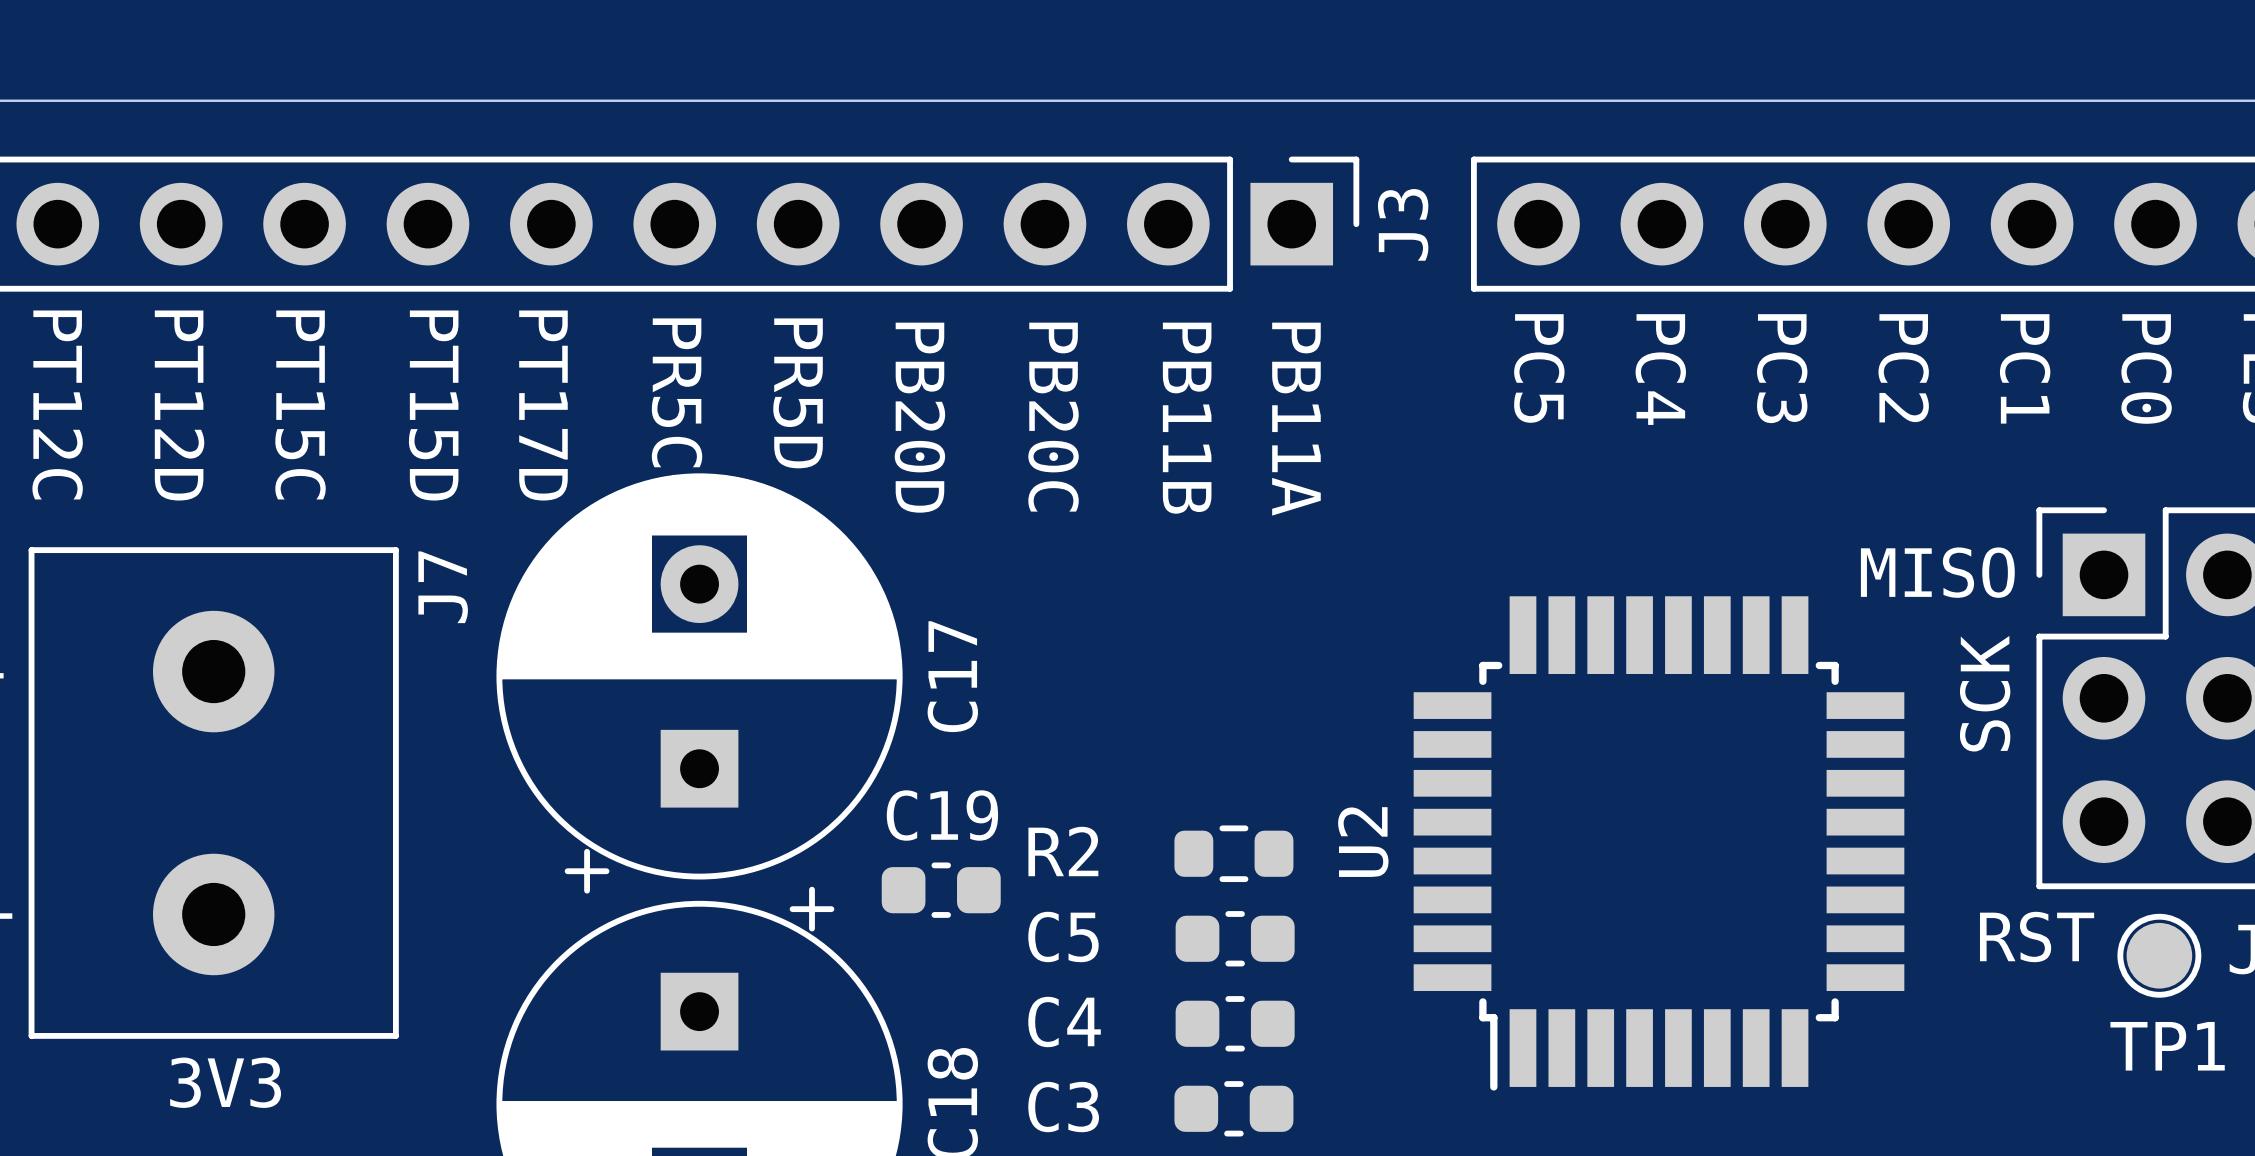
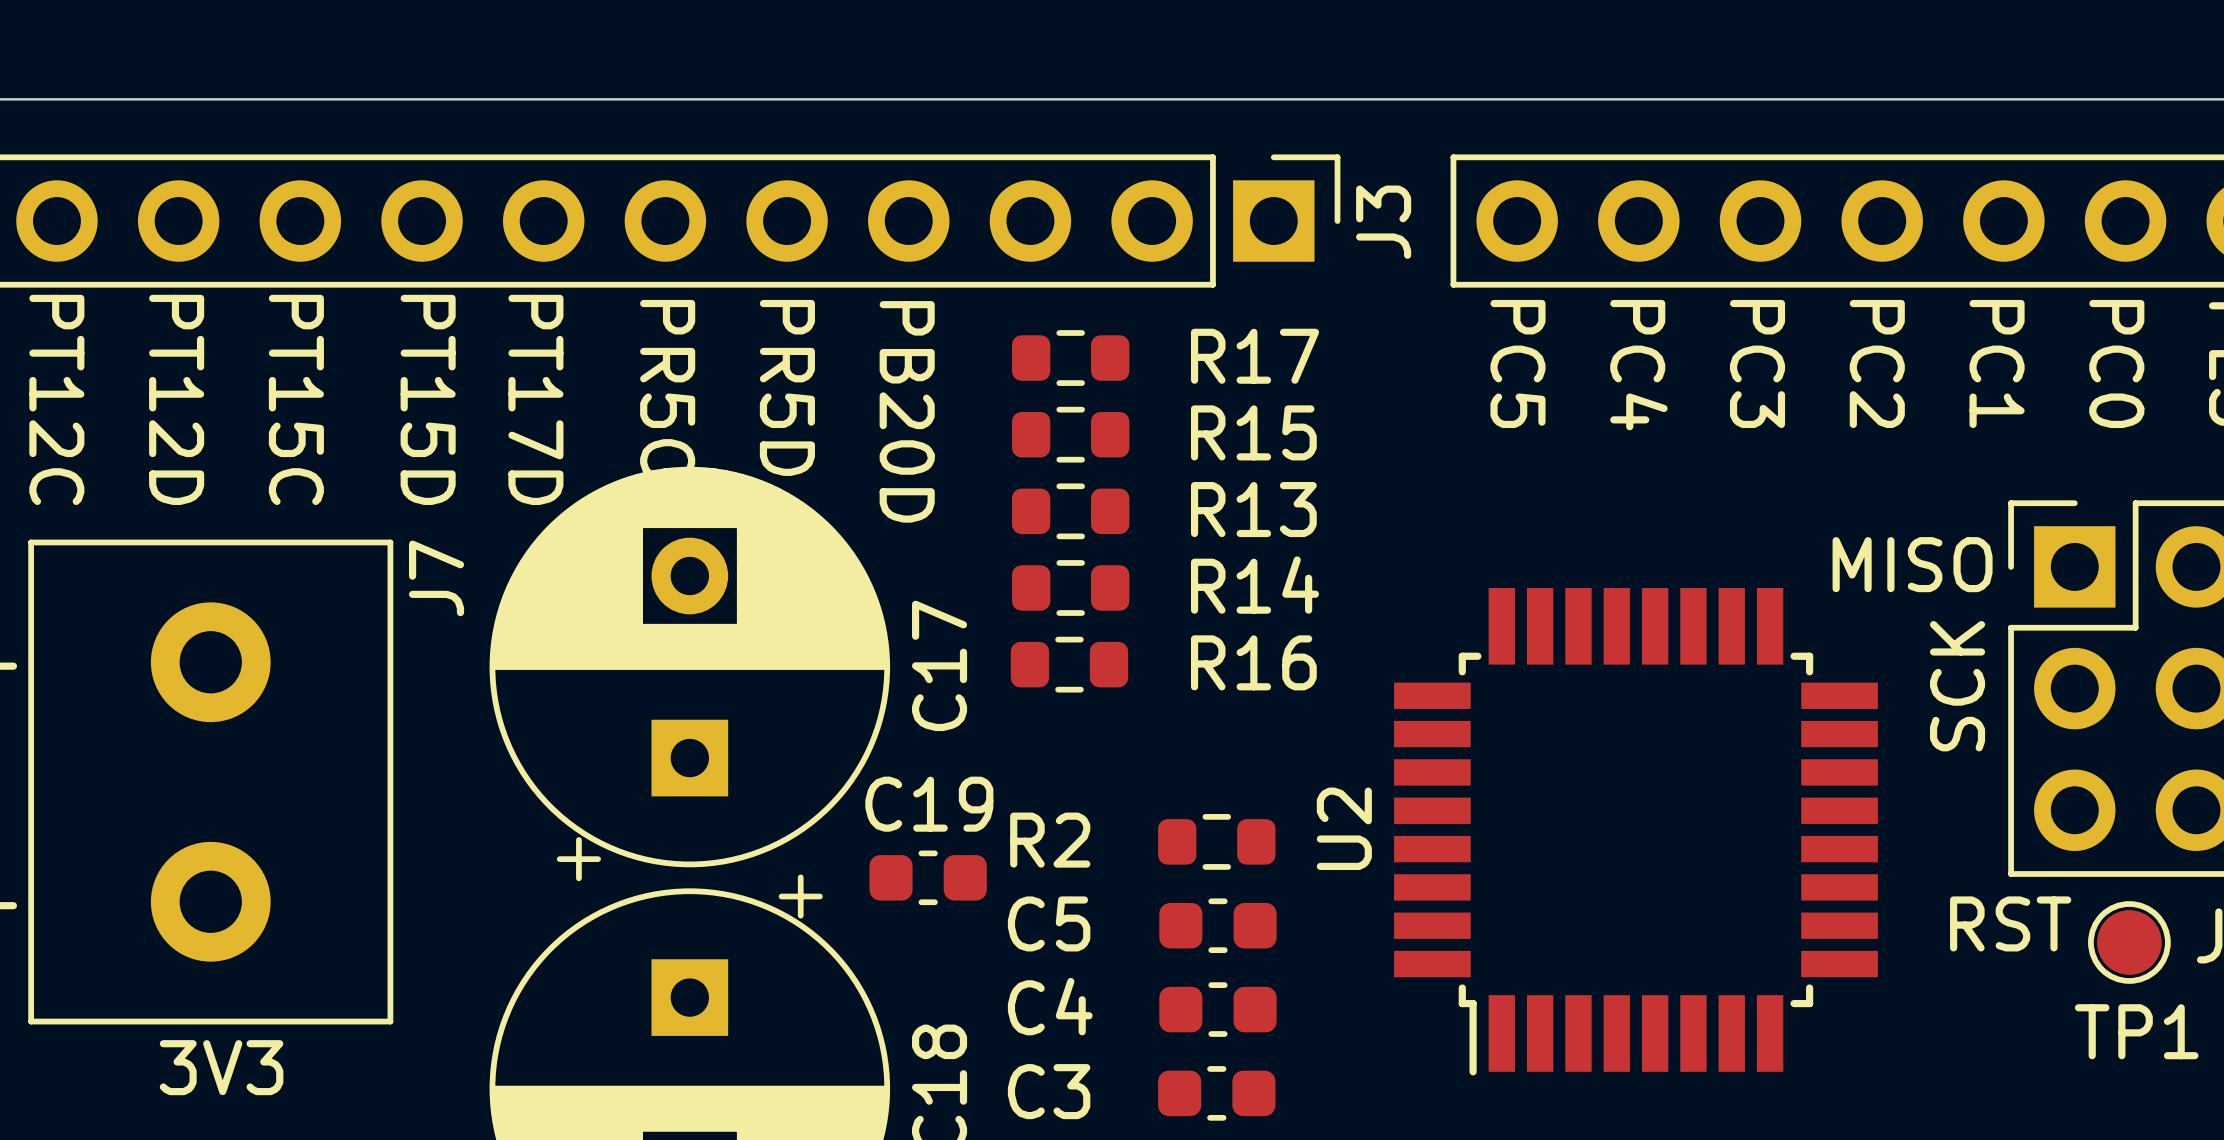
R17: none -> (1070, 358)
text: PB20C (1053, 417) -> none
text: PB11B (1187, 418) -> none
text: PB11A (1296, 419) -> none
R15: none -> (1070, 434)
R13: none -> (1070, 511)
R14: none -> (1070, 587)
R16: none -> (1069, 664)

